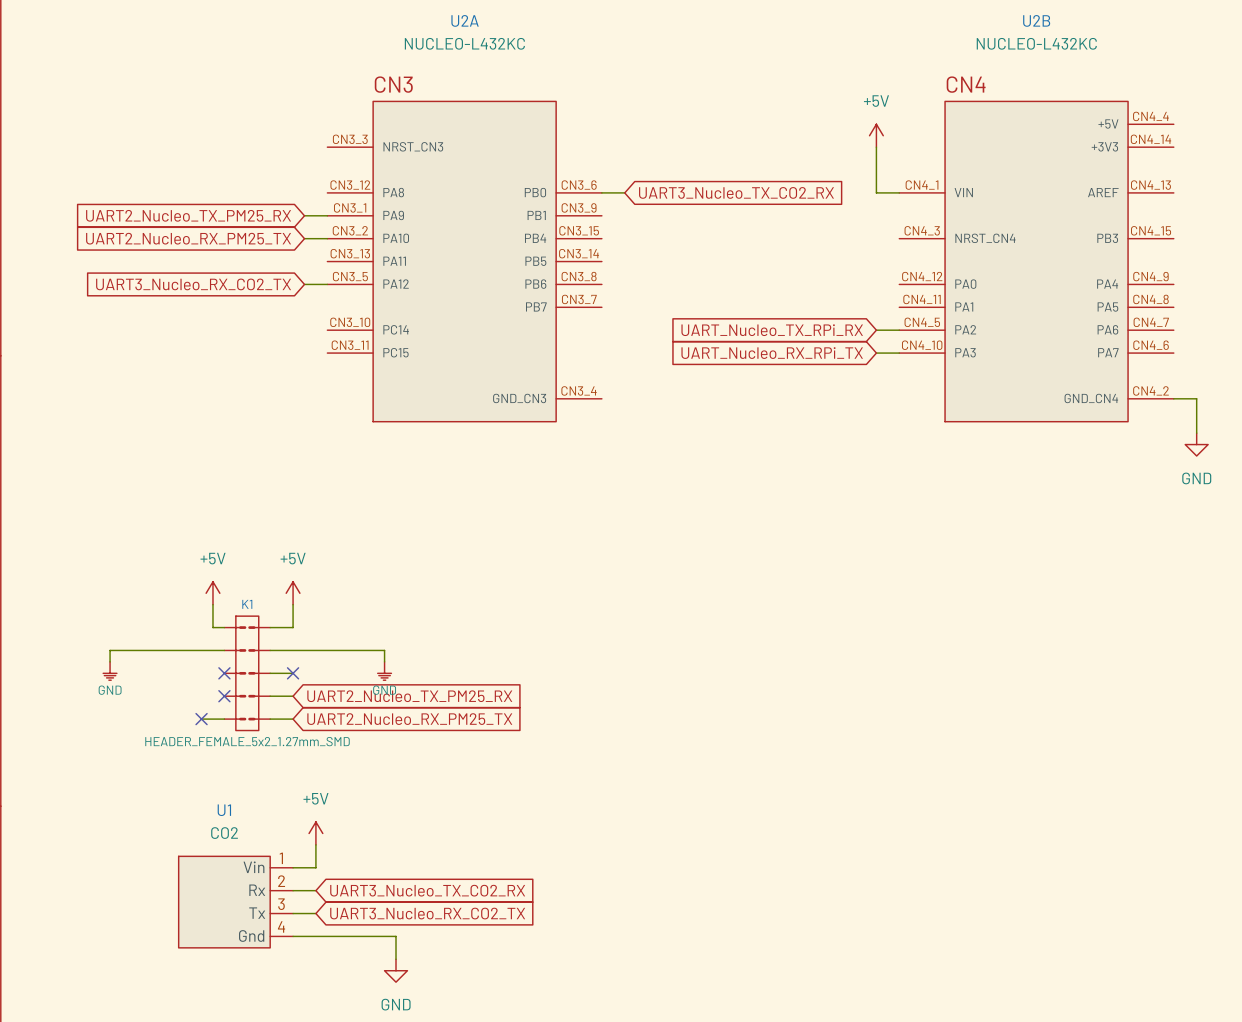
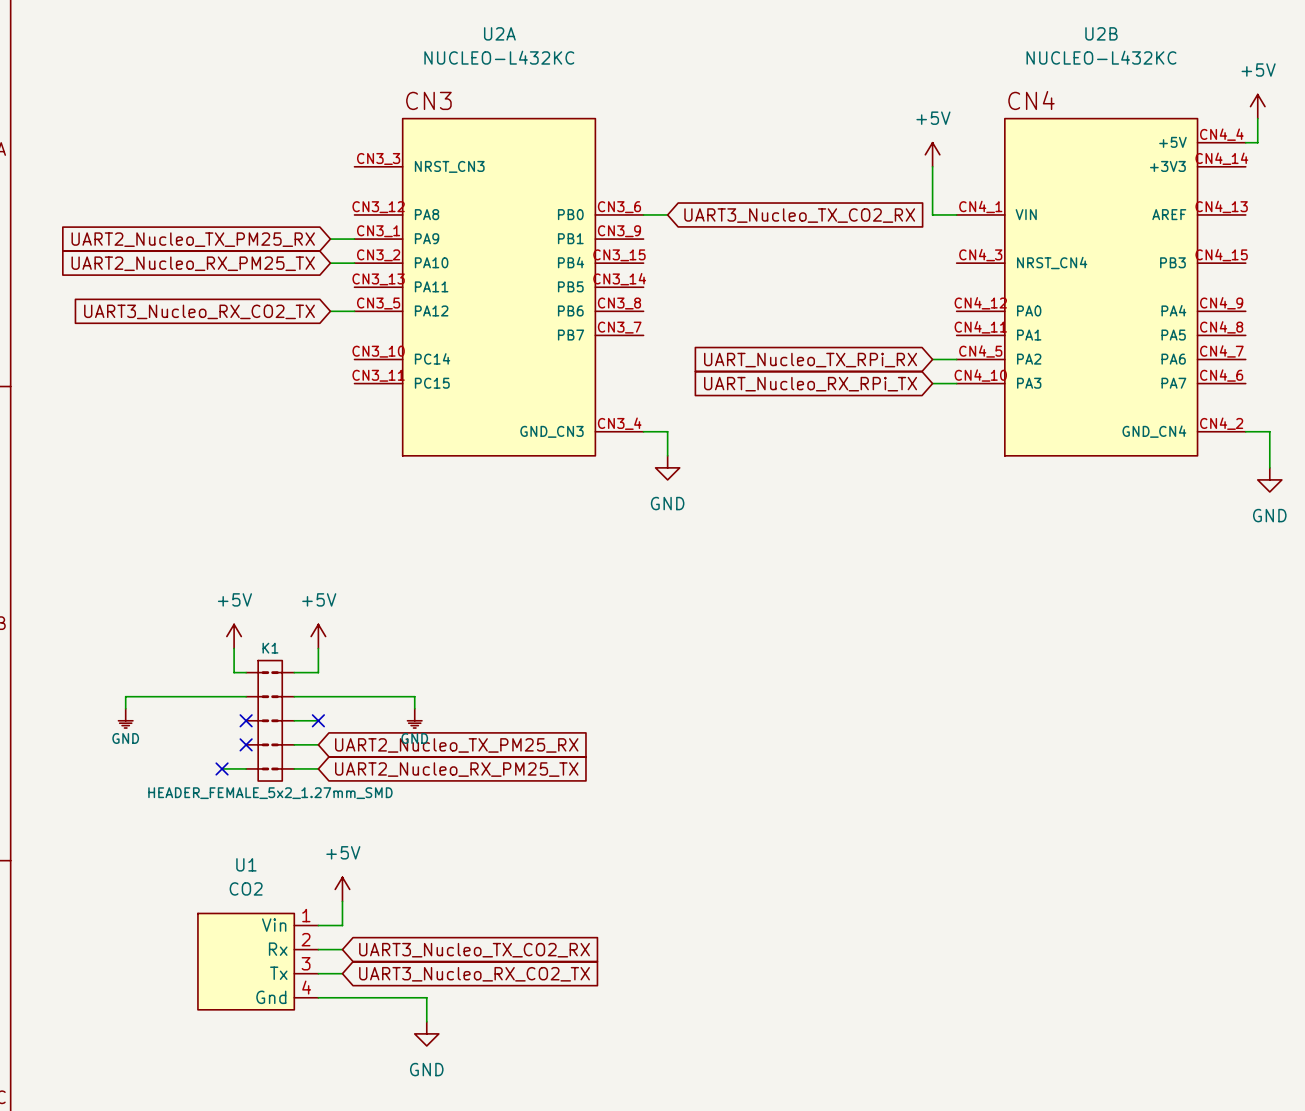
power symbol: none -> +5V (1257, 106)
wire: none -> (1257, 118) (1257, 142) (1245, 142)
wire: none -> (643, 431) (667, 431) (667, 455)
power symbol: none -> GND (667, 467)

